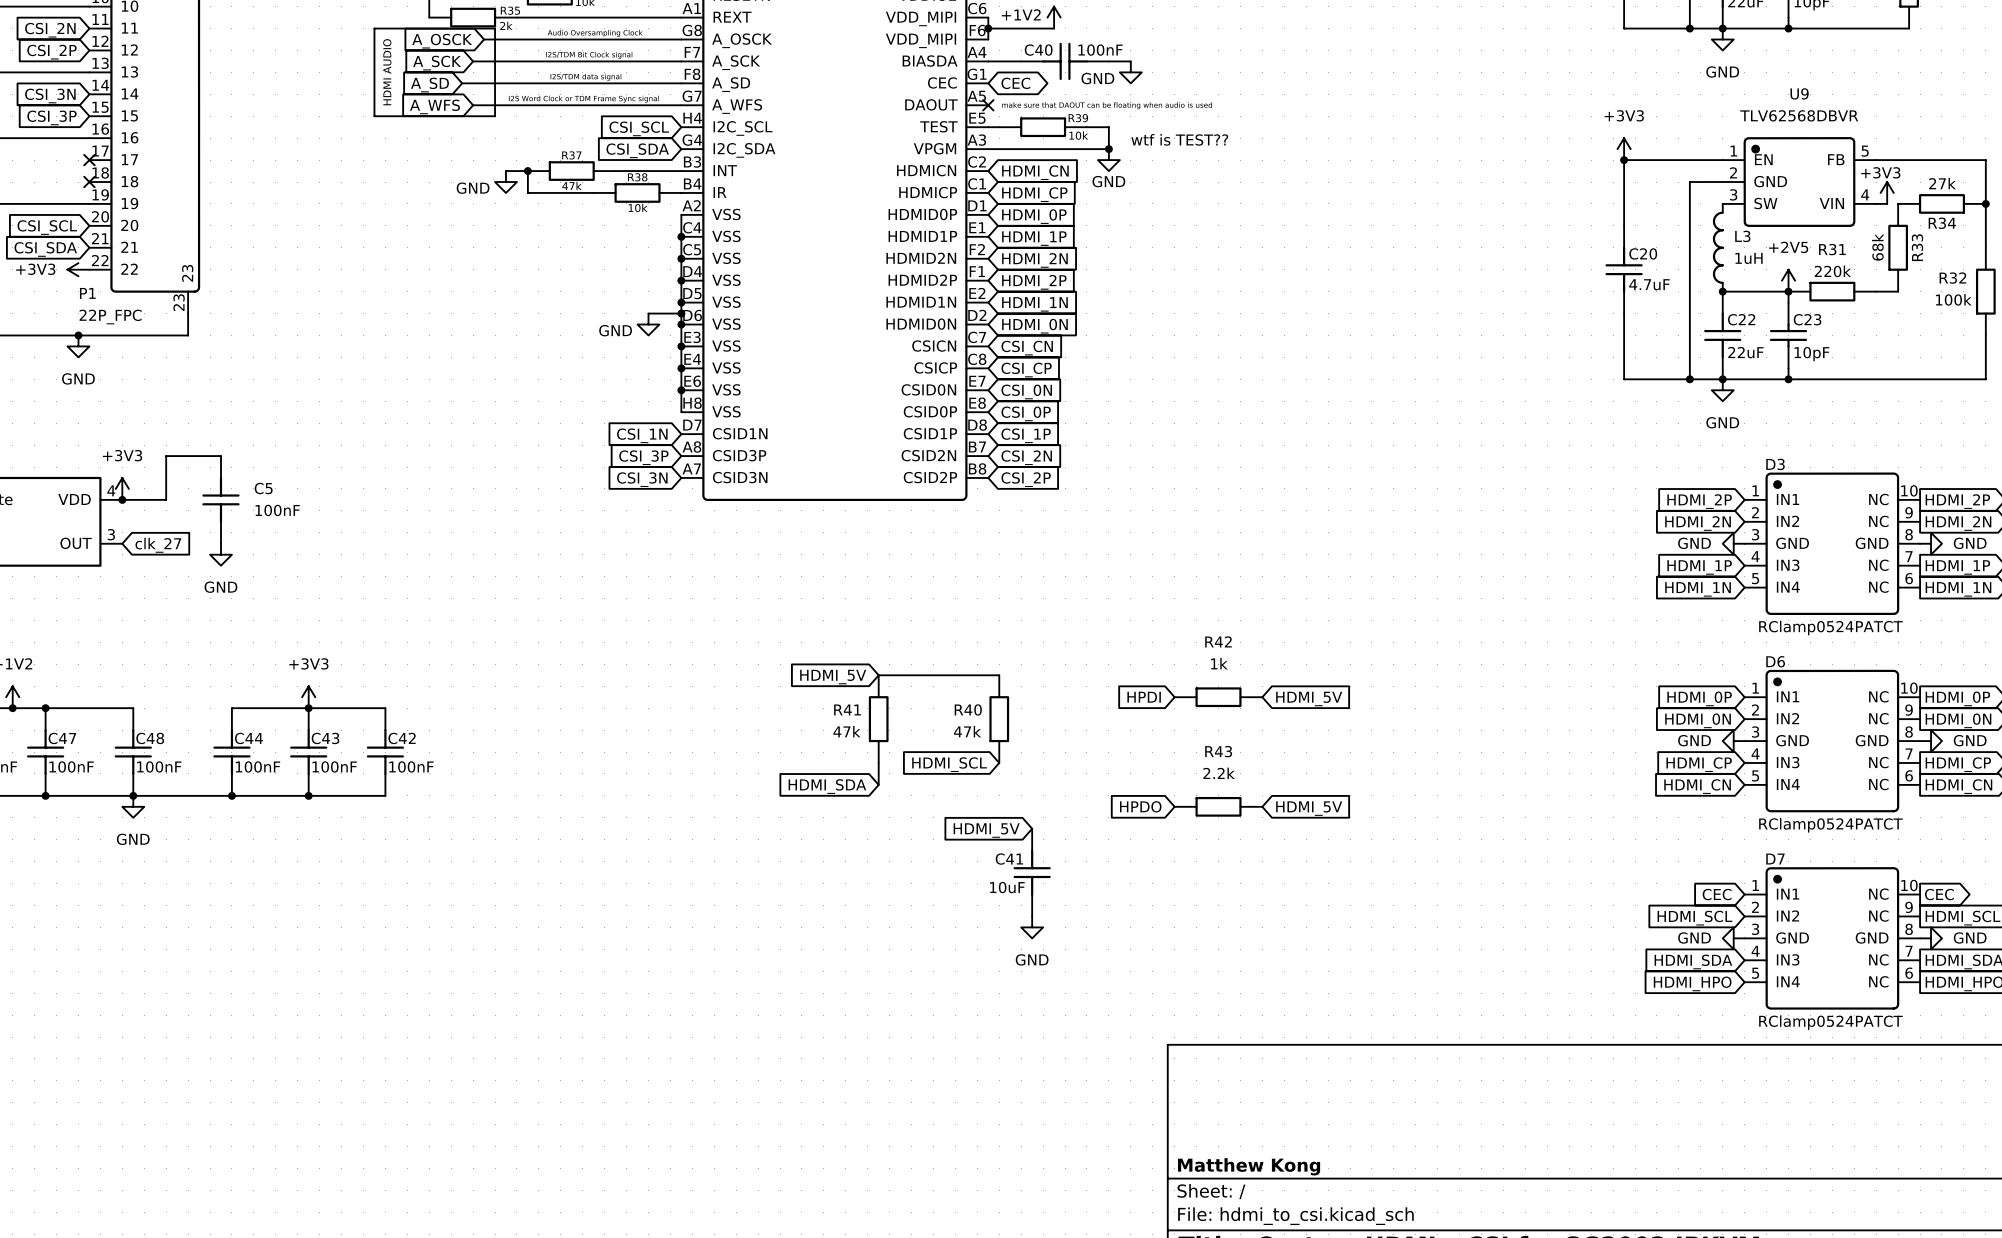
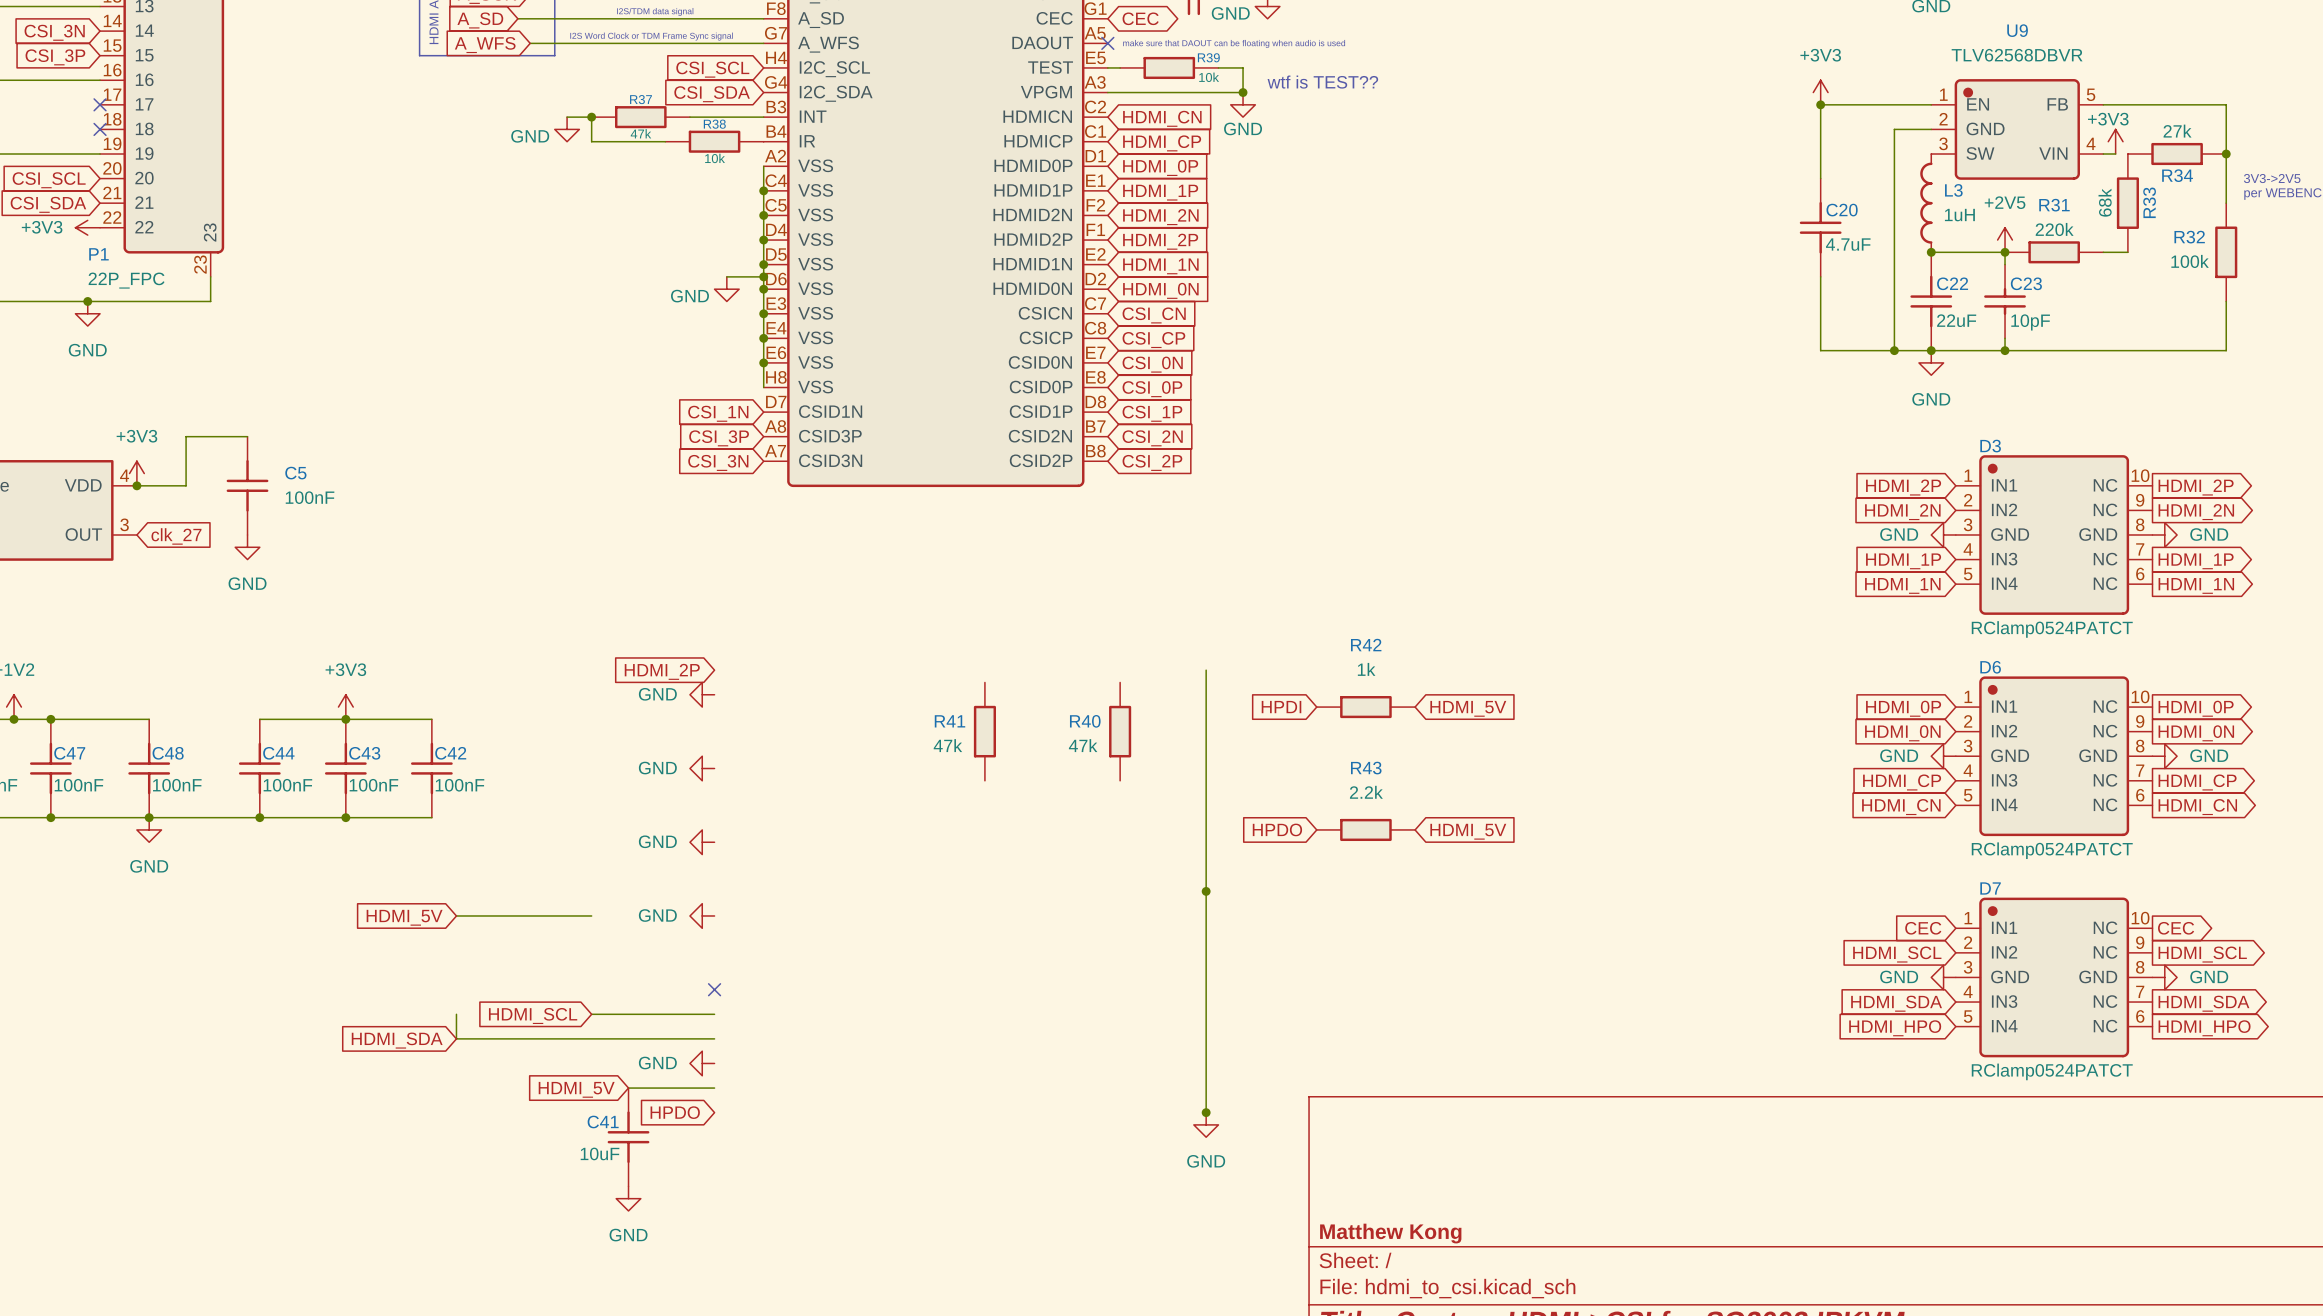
wire: none -> (1206, 670) (1206, 1112)
global label: none -> HDMI_2P (662, 671)
wire: (878, 675) (999, 675) -> none
global label: HDMI_5V (833, 677) -> none
power symbol: none -> GND (702, 694)
power symbol: none -> GND (702, 768)
wire: (878, 762) (878, 784) -> none
global label: HDMI_SCL (949, 764) -> none
global label: HDMI_SDA (827, 786) -> none
power symbol: none -> GND (702, 842)
global label: HDMI_5V (986, 830) -> none
junction: none -> (1206, 891)
C41 position: (1032, 872) -> (628, 1137)
wire: none -> (456, 915) (591, 915)
power symbol: none -> GND (702, 915)
global label: none -> HDMI_5V (404, 917)
power symbol position: GND (1032, 927) -> GND (1206, 1124)
no-connect mark: none -> (714, 989)
wire: none -> (456, 1014) (456, 1038) (714, 1038)
wire: none -> (591, 1014) (714, 1014)
global label: none -> HDMI_SCL (533, 1015)
global label: none -> HDMI_SDA (397, 1040)
power symbol: none -> GND (702, 1063)
wire: none -> (628, 1088) (714, 1088)
global label: none -> HDMI_5V (576, 1089)
global label: none -> HPDO (675, 1112)
junction: none -> (1206, 1112)
power symbol: none -> GND (628, 1198)

